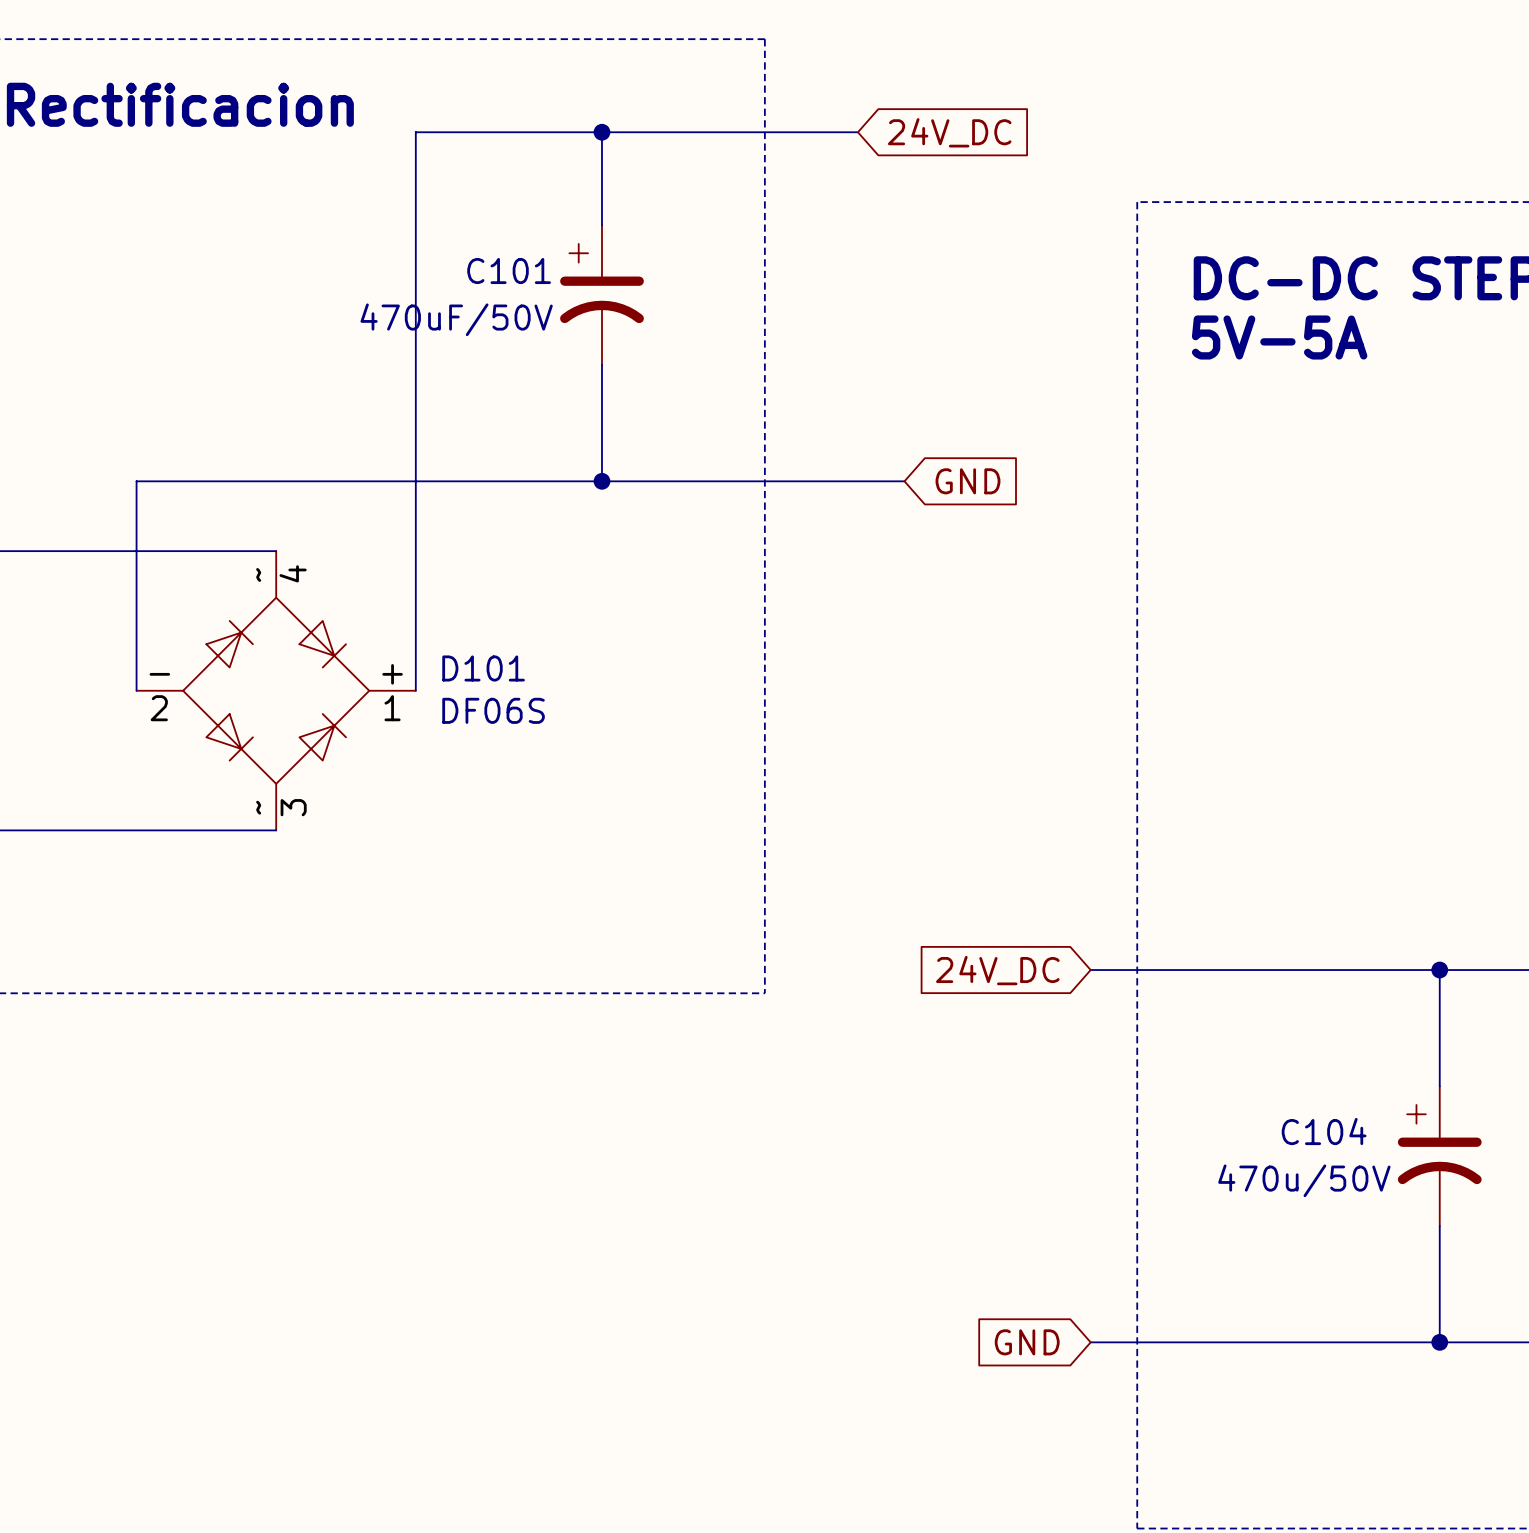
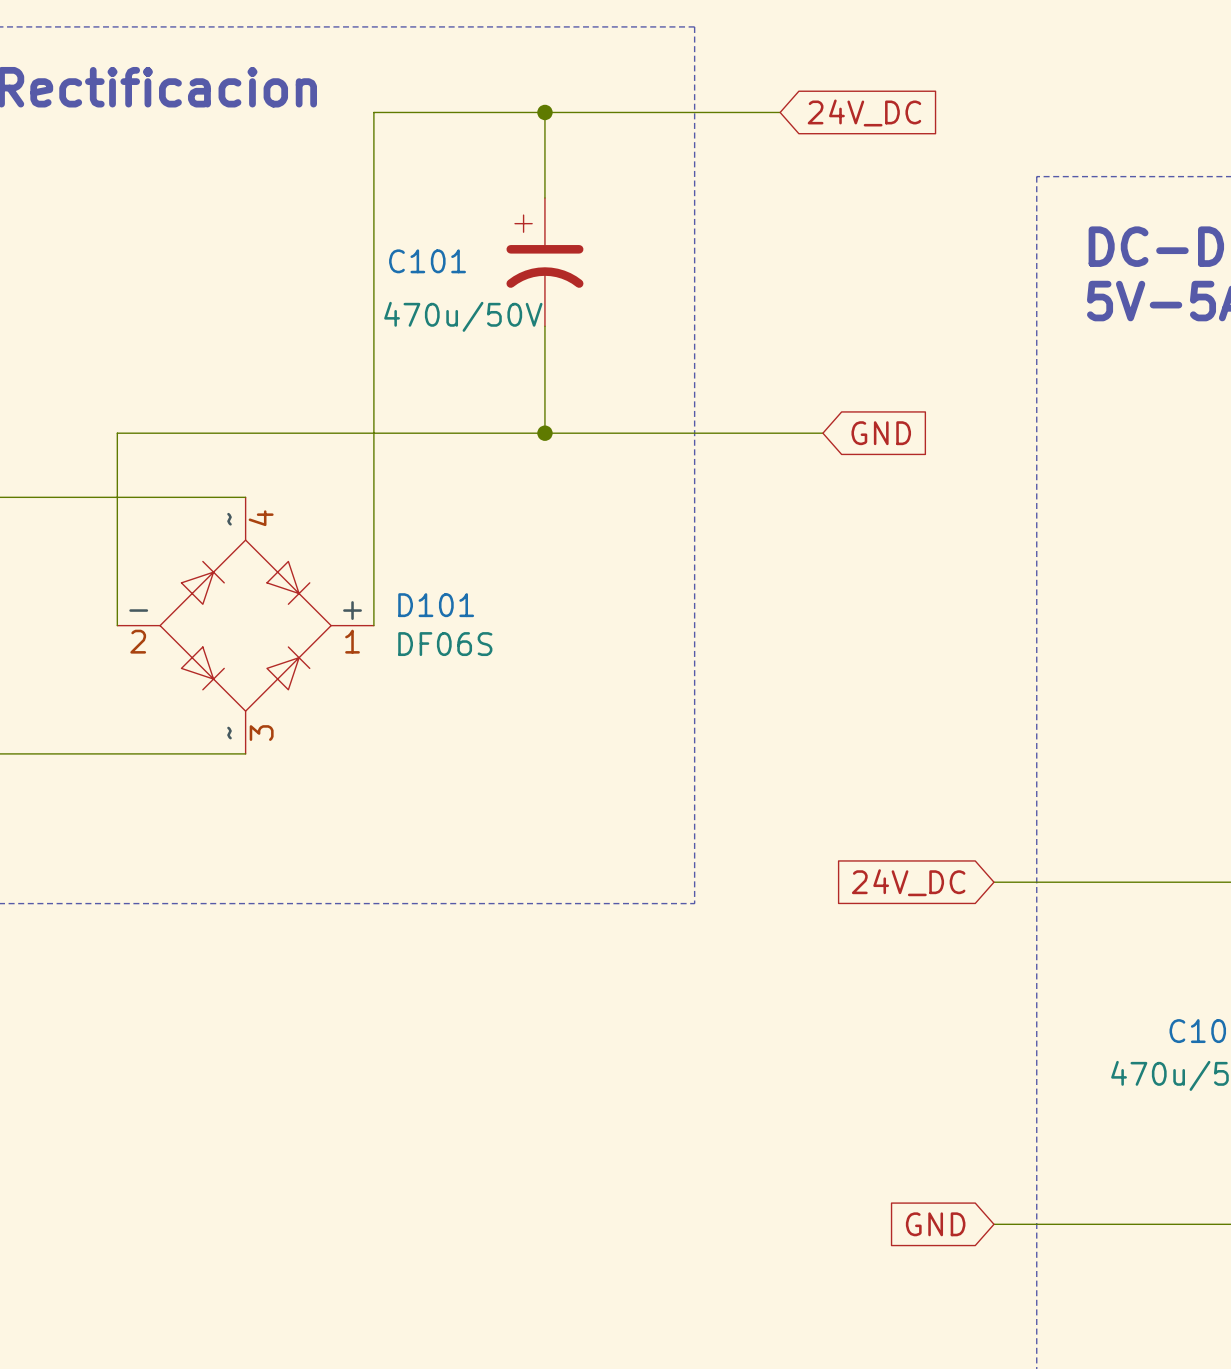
C101 name position: C101 (509, 271) -> C101 (427, 261)
C101 value: 470uF/50V (456, 319) -> 470u/50V (463, 316)

